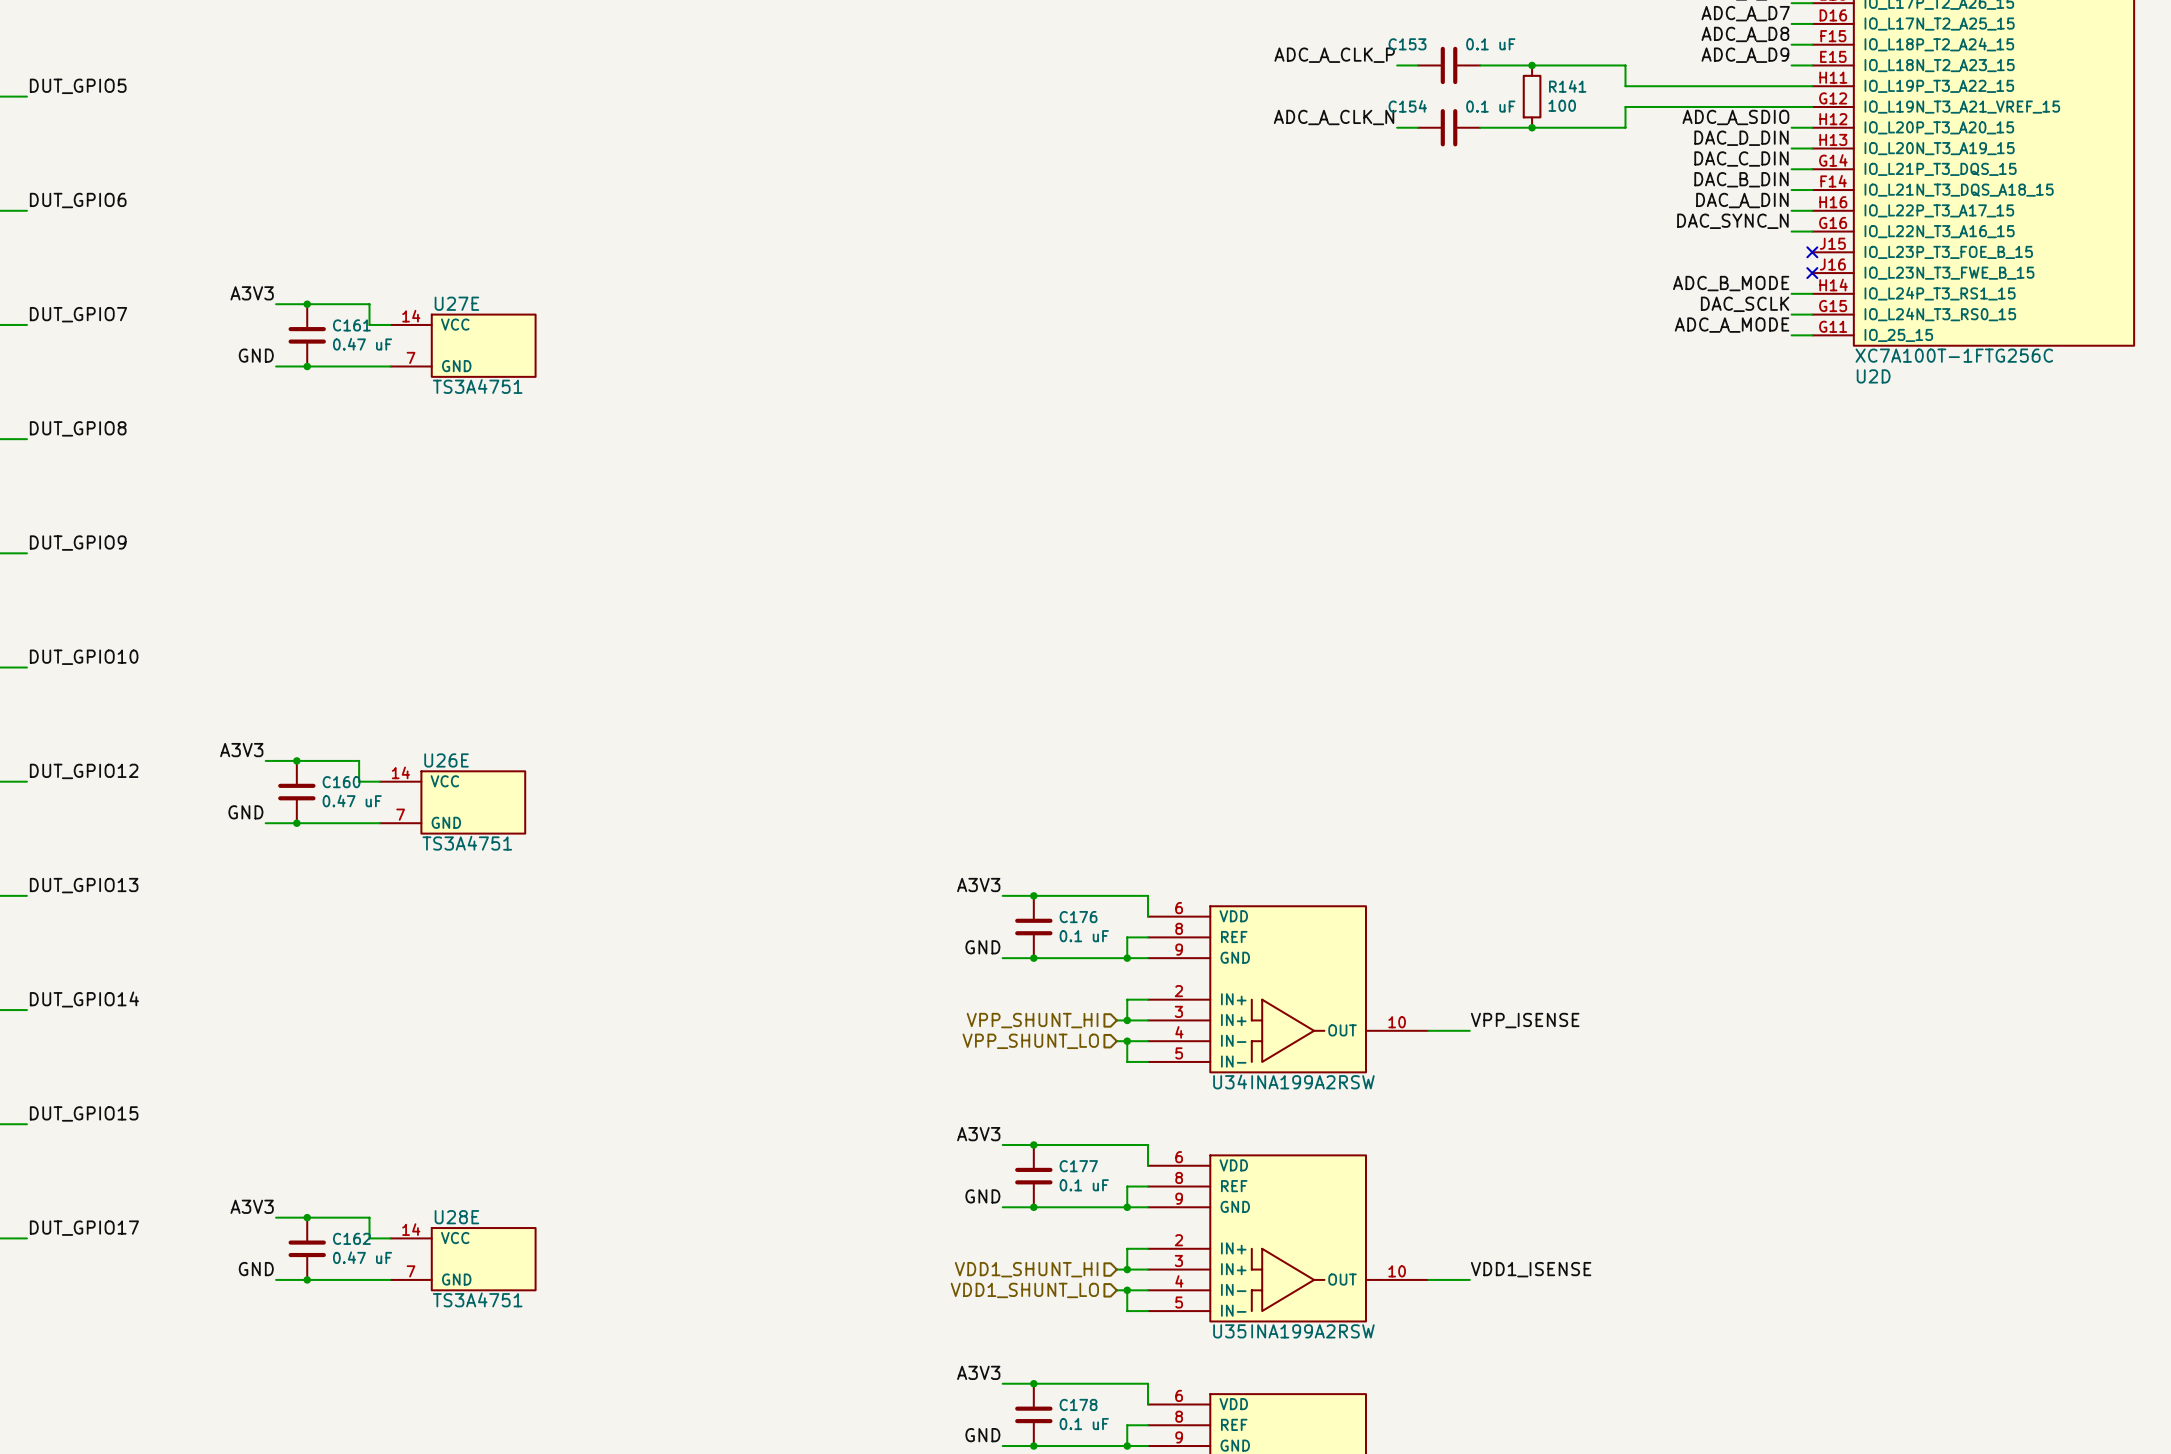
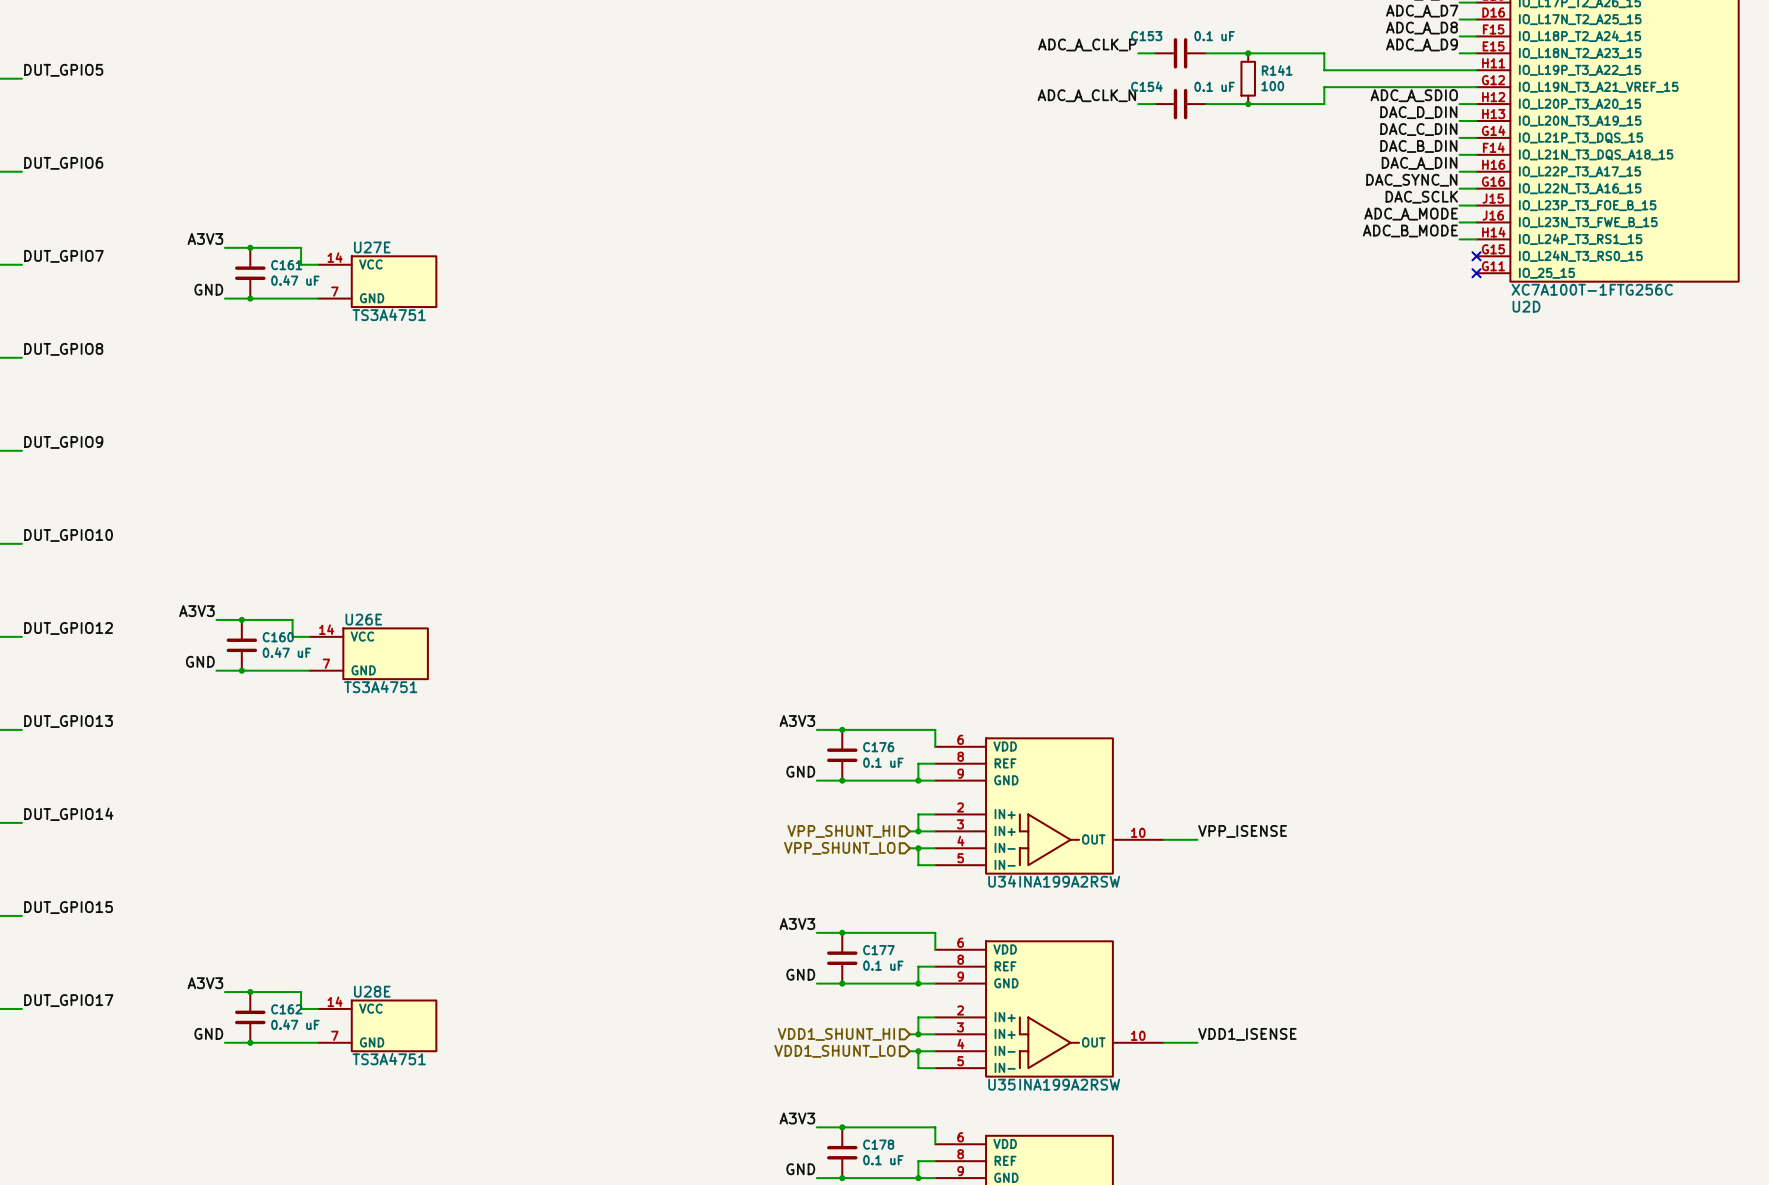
no-connect mark: (1812, 252) -> none
no-connect mark: (1812, 273) -> none
label position: DAC_SCLK (1745, 304) -> DAC_SCLK (1421, 197)
wire: (1791, 314) (1812, 314) -> (1459, 222) (1476, 222)
no-connect mark: none -> (1476, 256)
label position: ADC_A_MODE (1732, 325) -> ADC_A_MODE (1411, 214)
wire: (1791, 335) (1812, 335) -> (1459, 205) (1476, 205)
no-connect mark: none -> (1476, 273)

